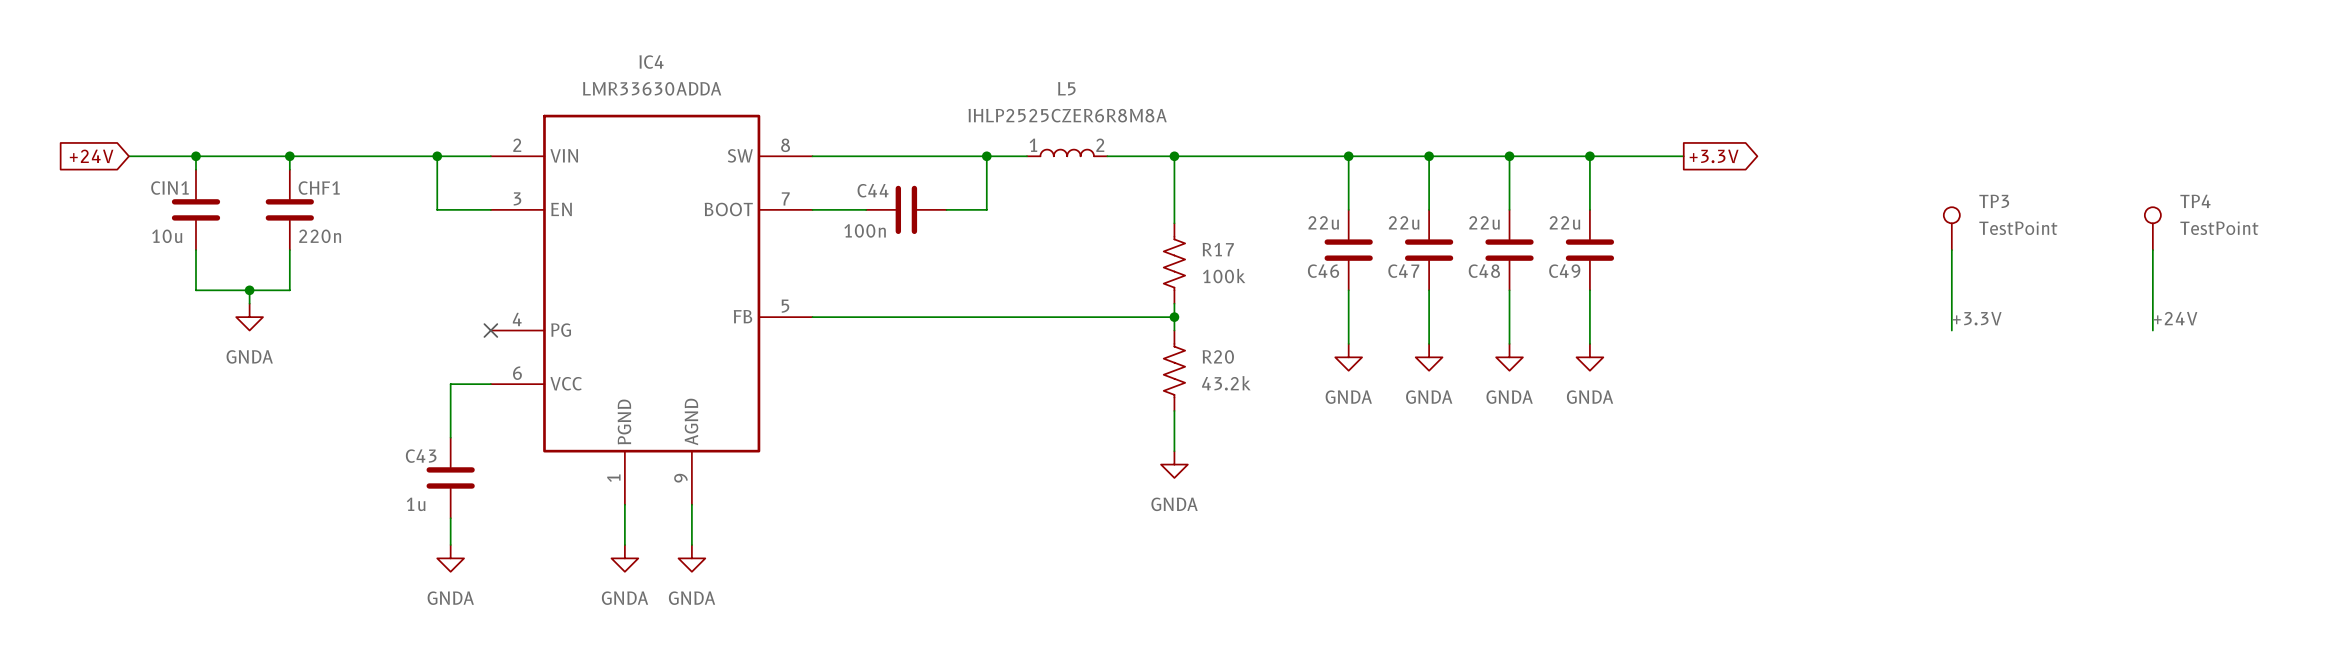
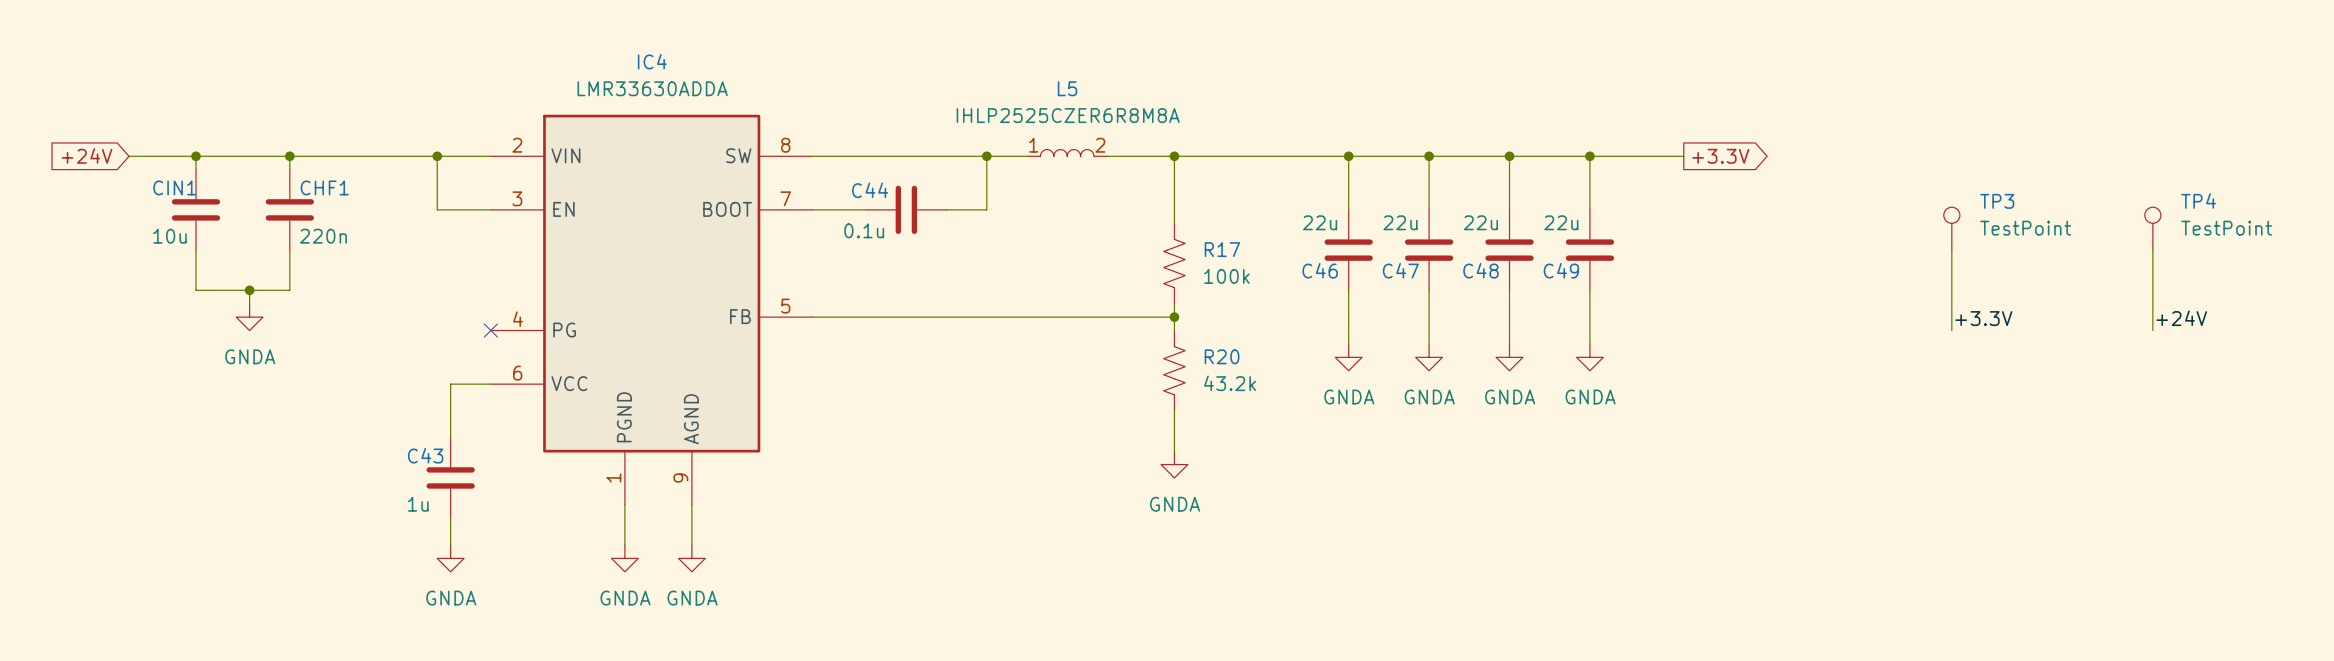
C44 value: 100n (865, 230) -> 0.1u (864, 230)

